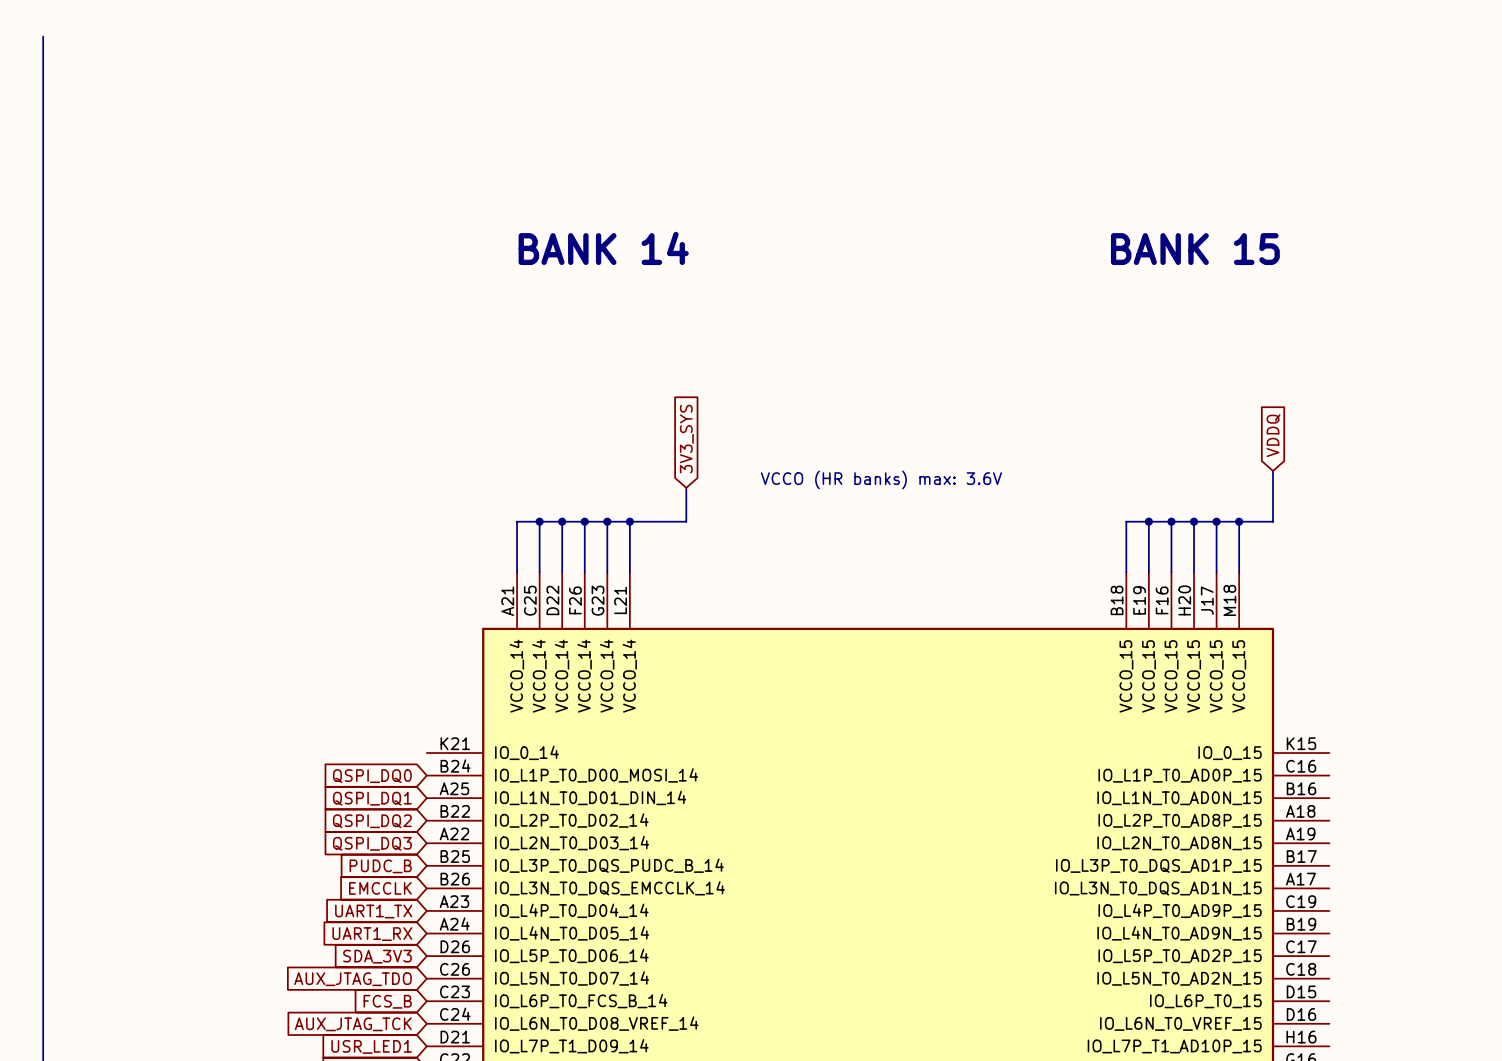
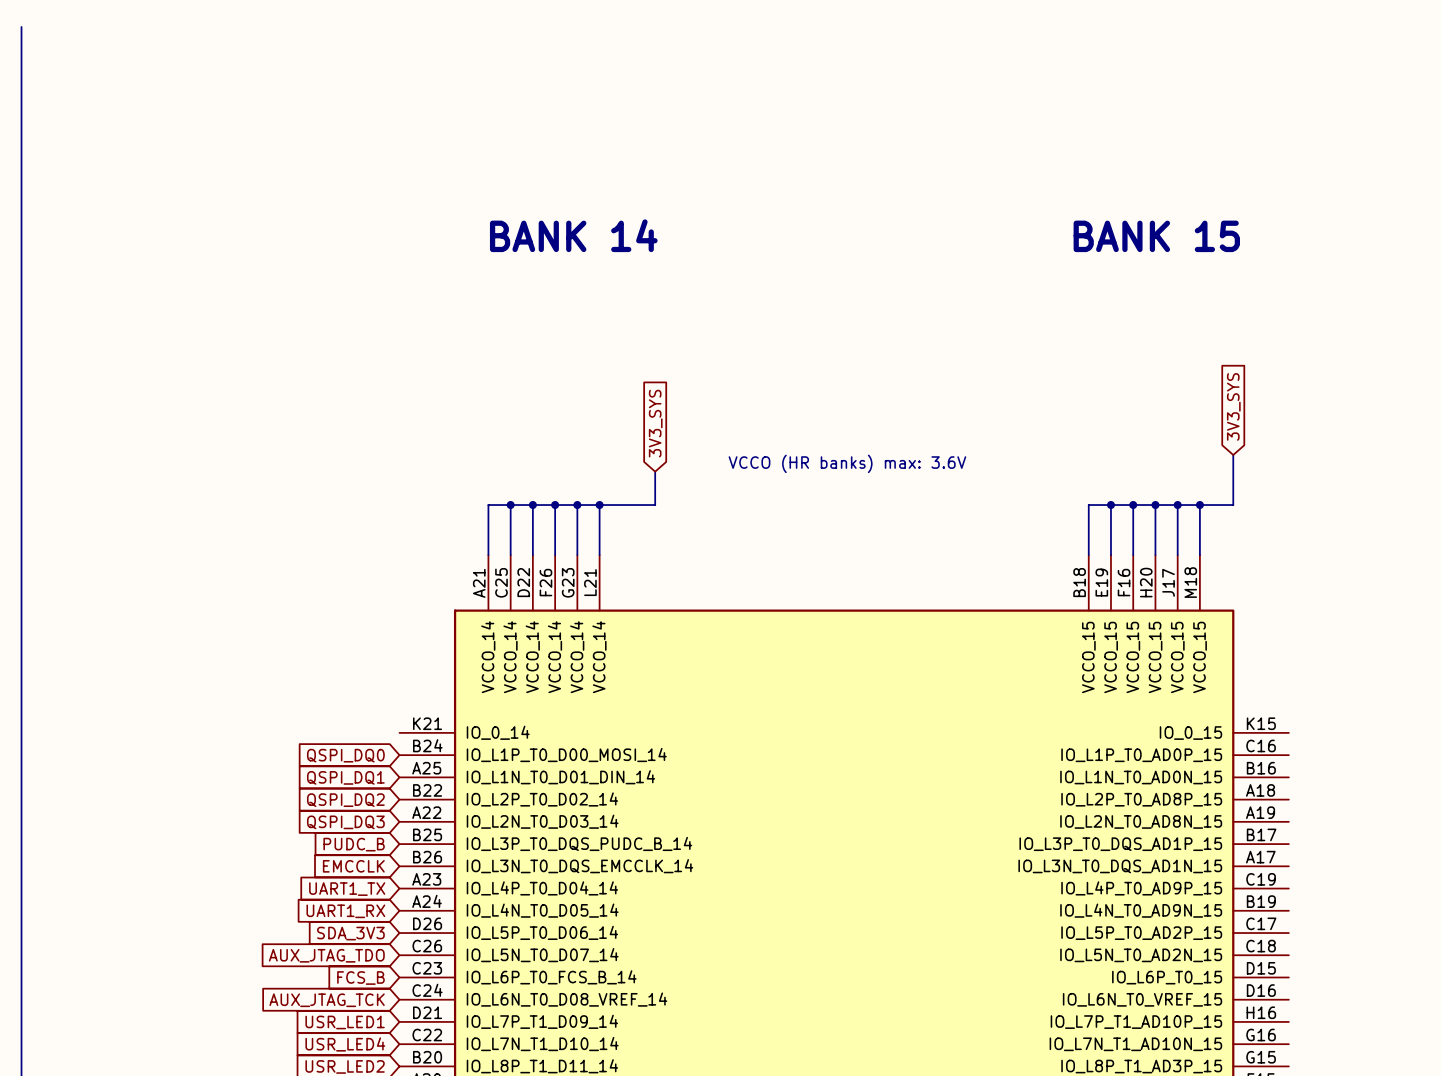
global label: VDDQ (1273, 435) -> 3V3_SYS (1233, 406)

